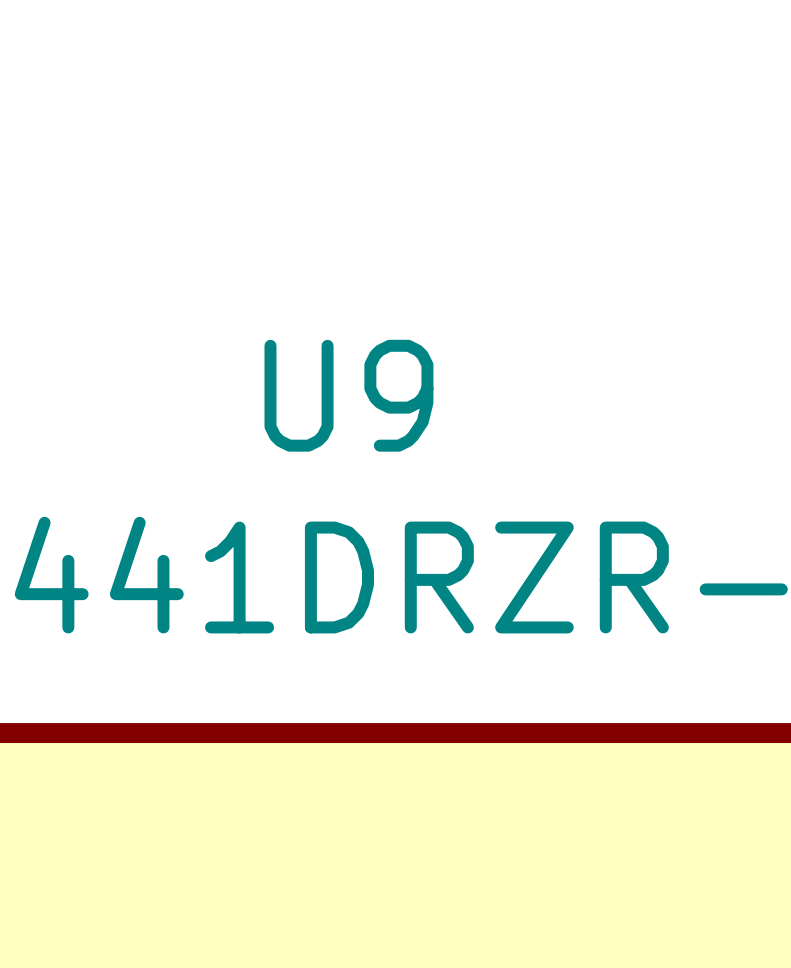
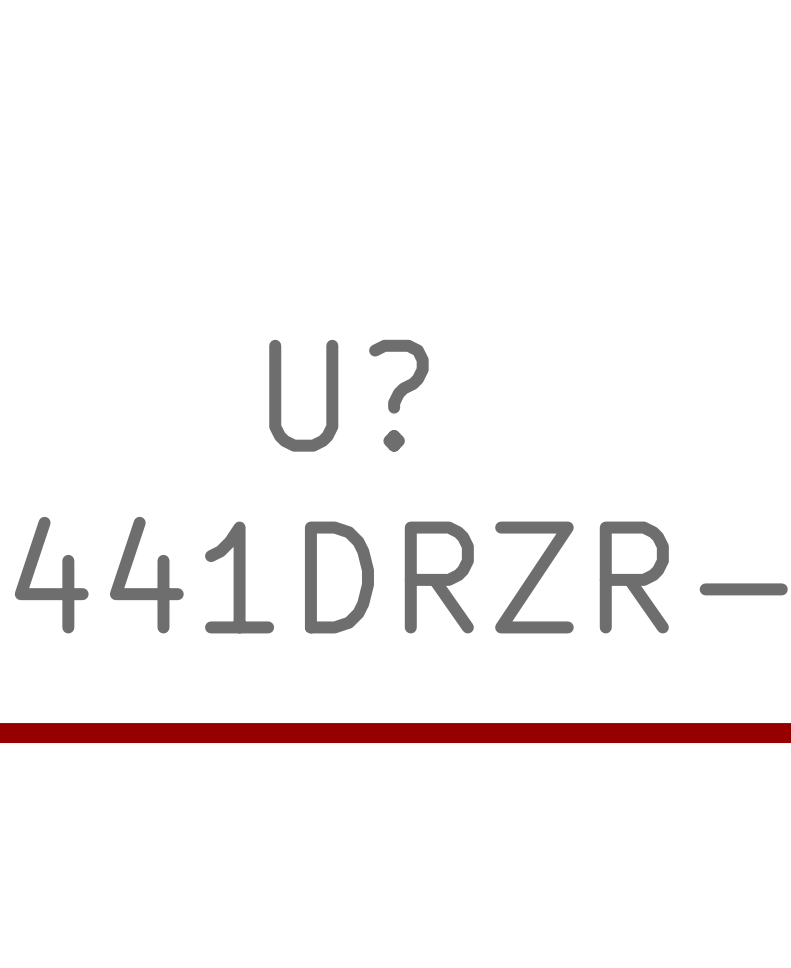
U9 name: U9 (348, 395) -> U? (348, 395)

